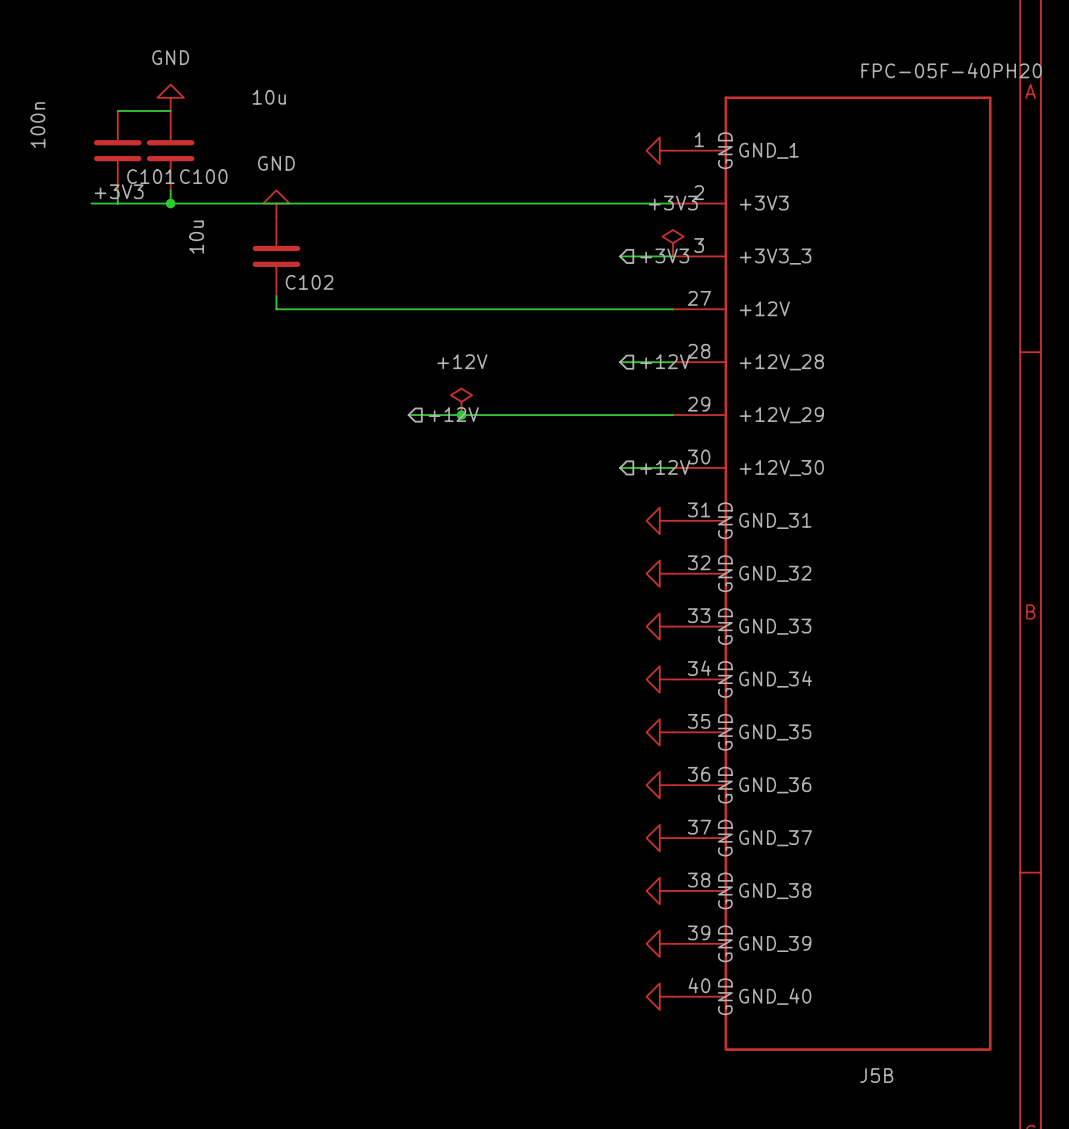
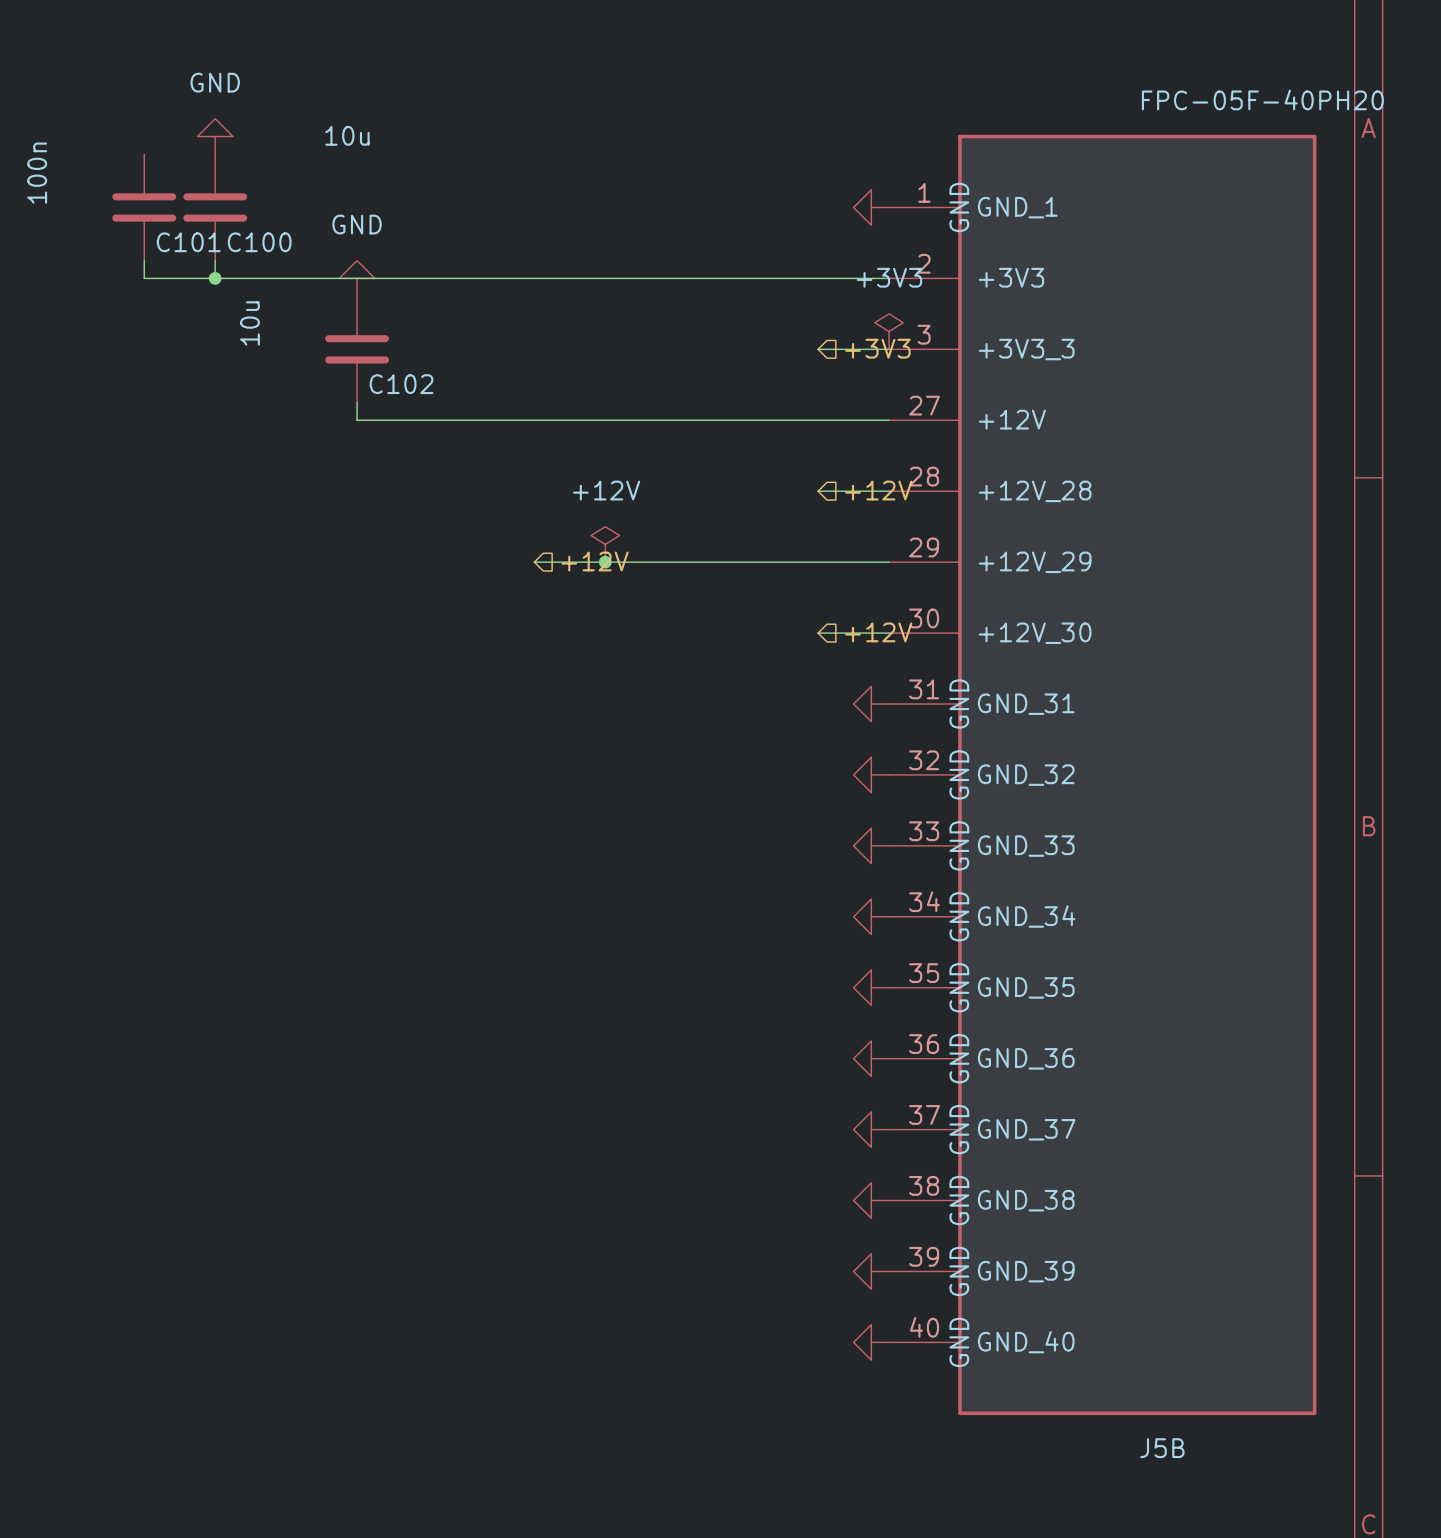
wire: (117, 111) (170, 111) -> none
label: +3V3 (119, 191) -> none
wire: (91, 203) (117, 203) -> none

